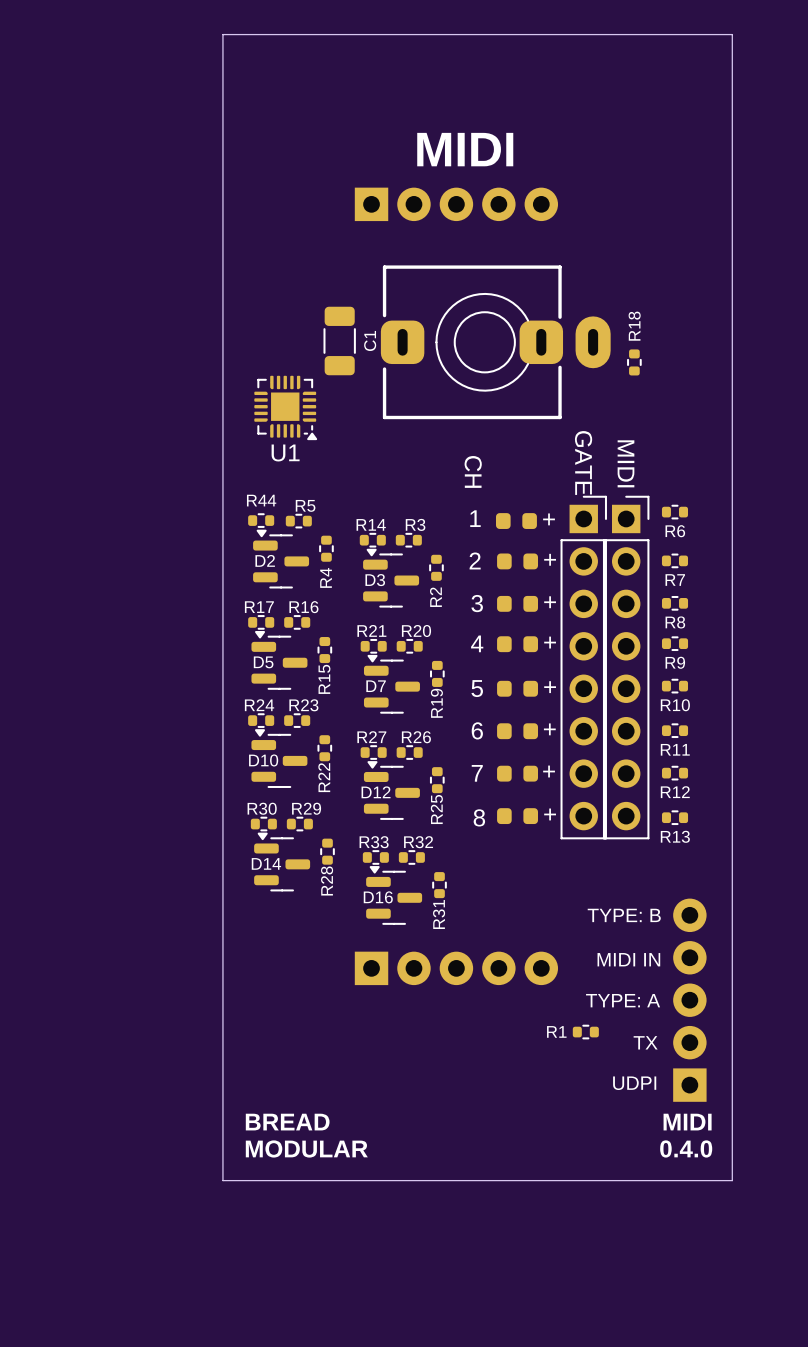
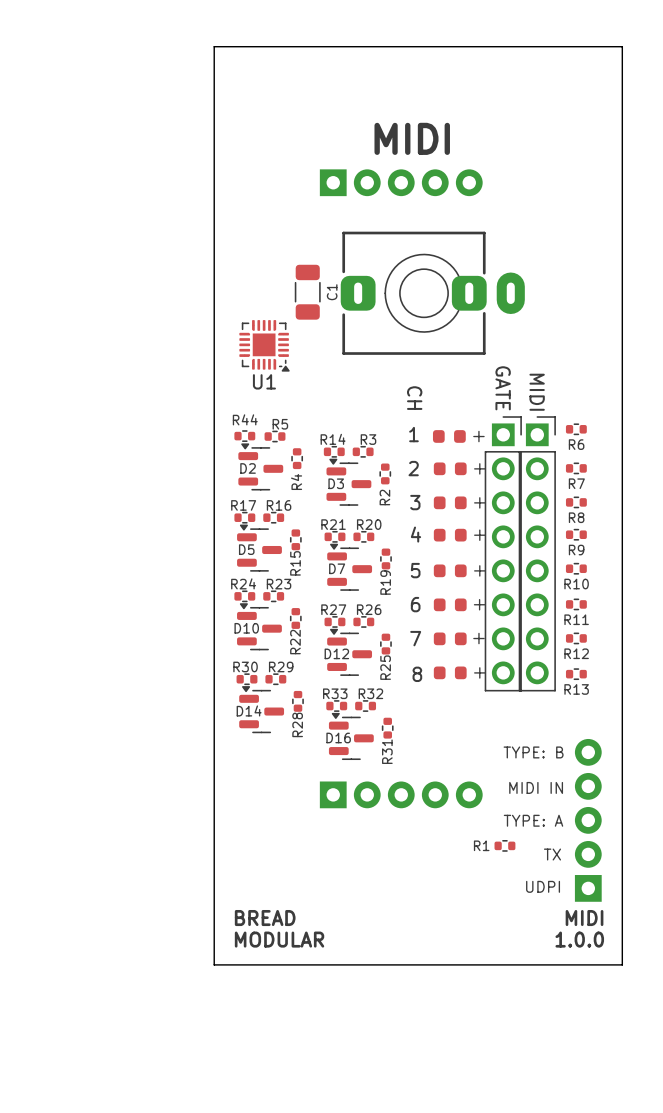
R18: (634, 362) -> none
text: 0.4.0 (686, 1148) -> 1.0.0 (579, 939)

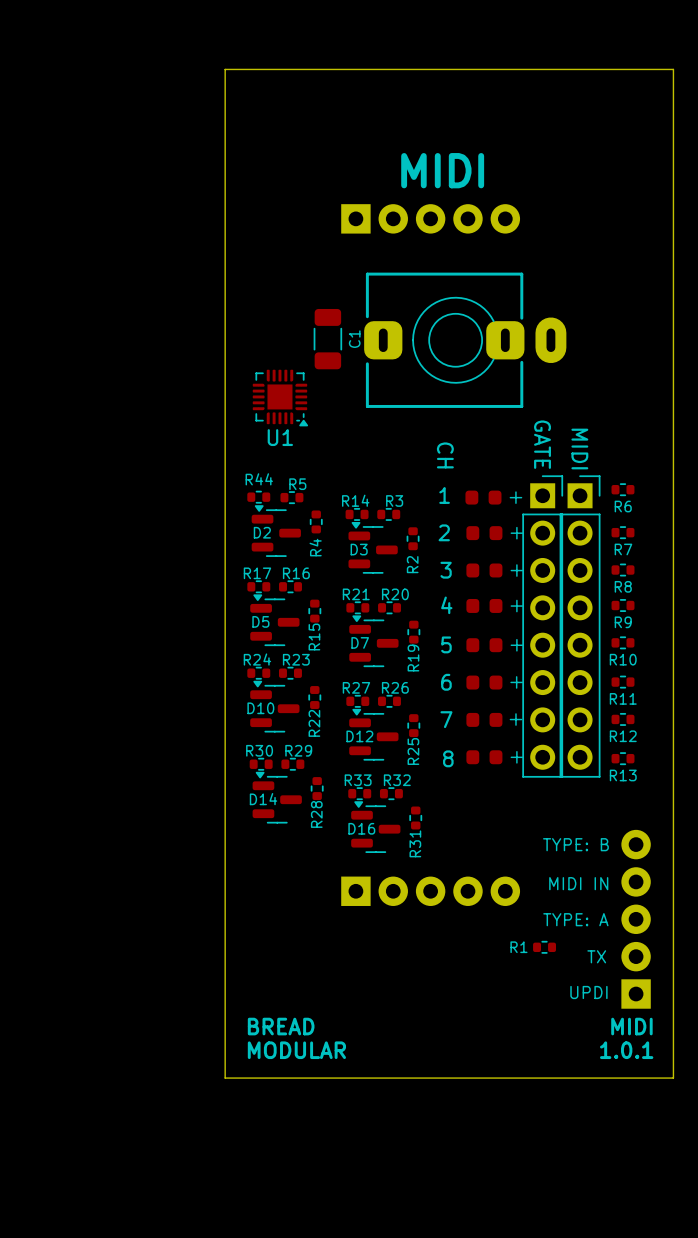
text: UDPI (543, 886) -> UPDI (588, 992)
text: 1.0.0 (579, 939) -> 1.0.1 (626, 1050)

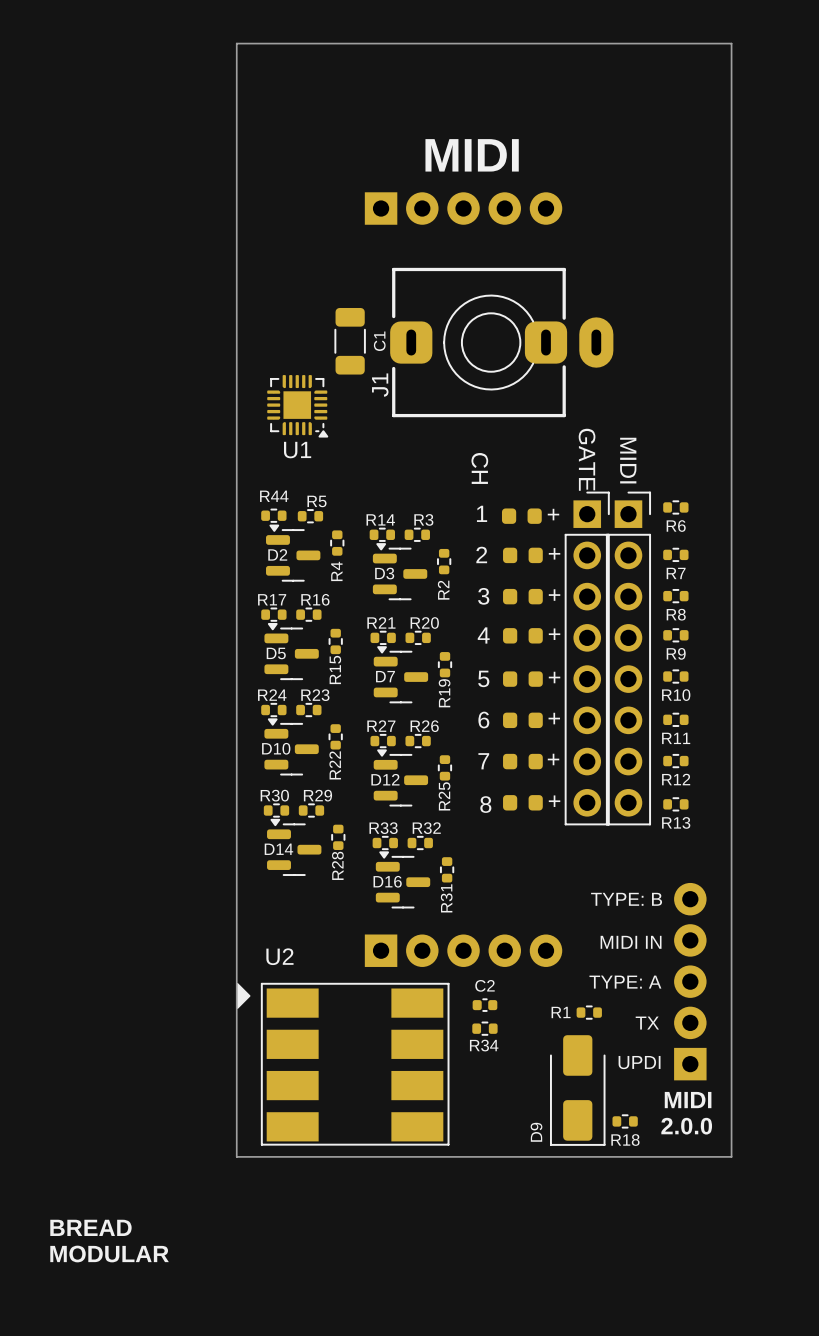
J1 name: none -> J1 (380, 385)
C2: none -> (484, 1005)
R34: none -> (484, 1028)
U2: none -> (343, 1064)
D9: none -> (577, 1090)
text position: BREAD (281, 1026) -> BREAD (90, 1227)
R18: none -> (625, 1121)
text position: MODULAR (296, 1050) -> MODULAR (109, 1254)
text: 1.0.1 (626, 1050) -> 2.0.0 (686, 1126)

